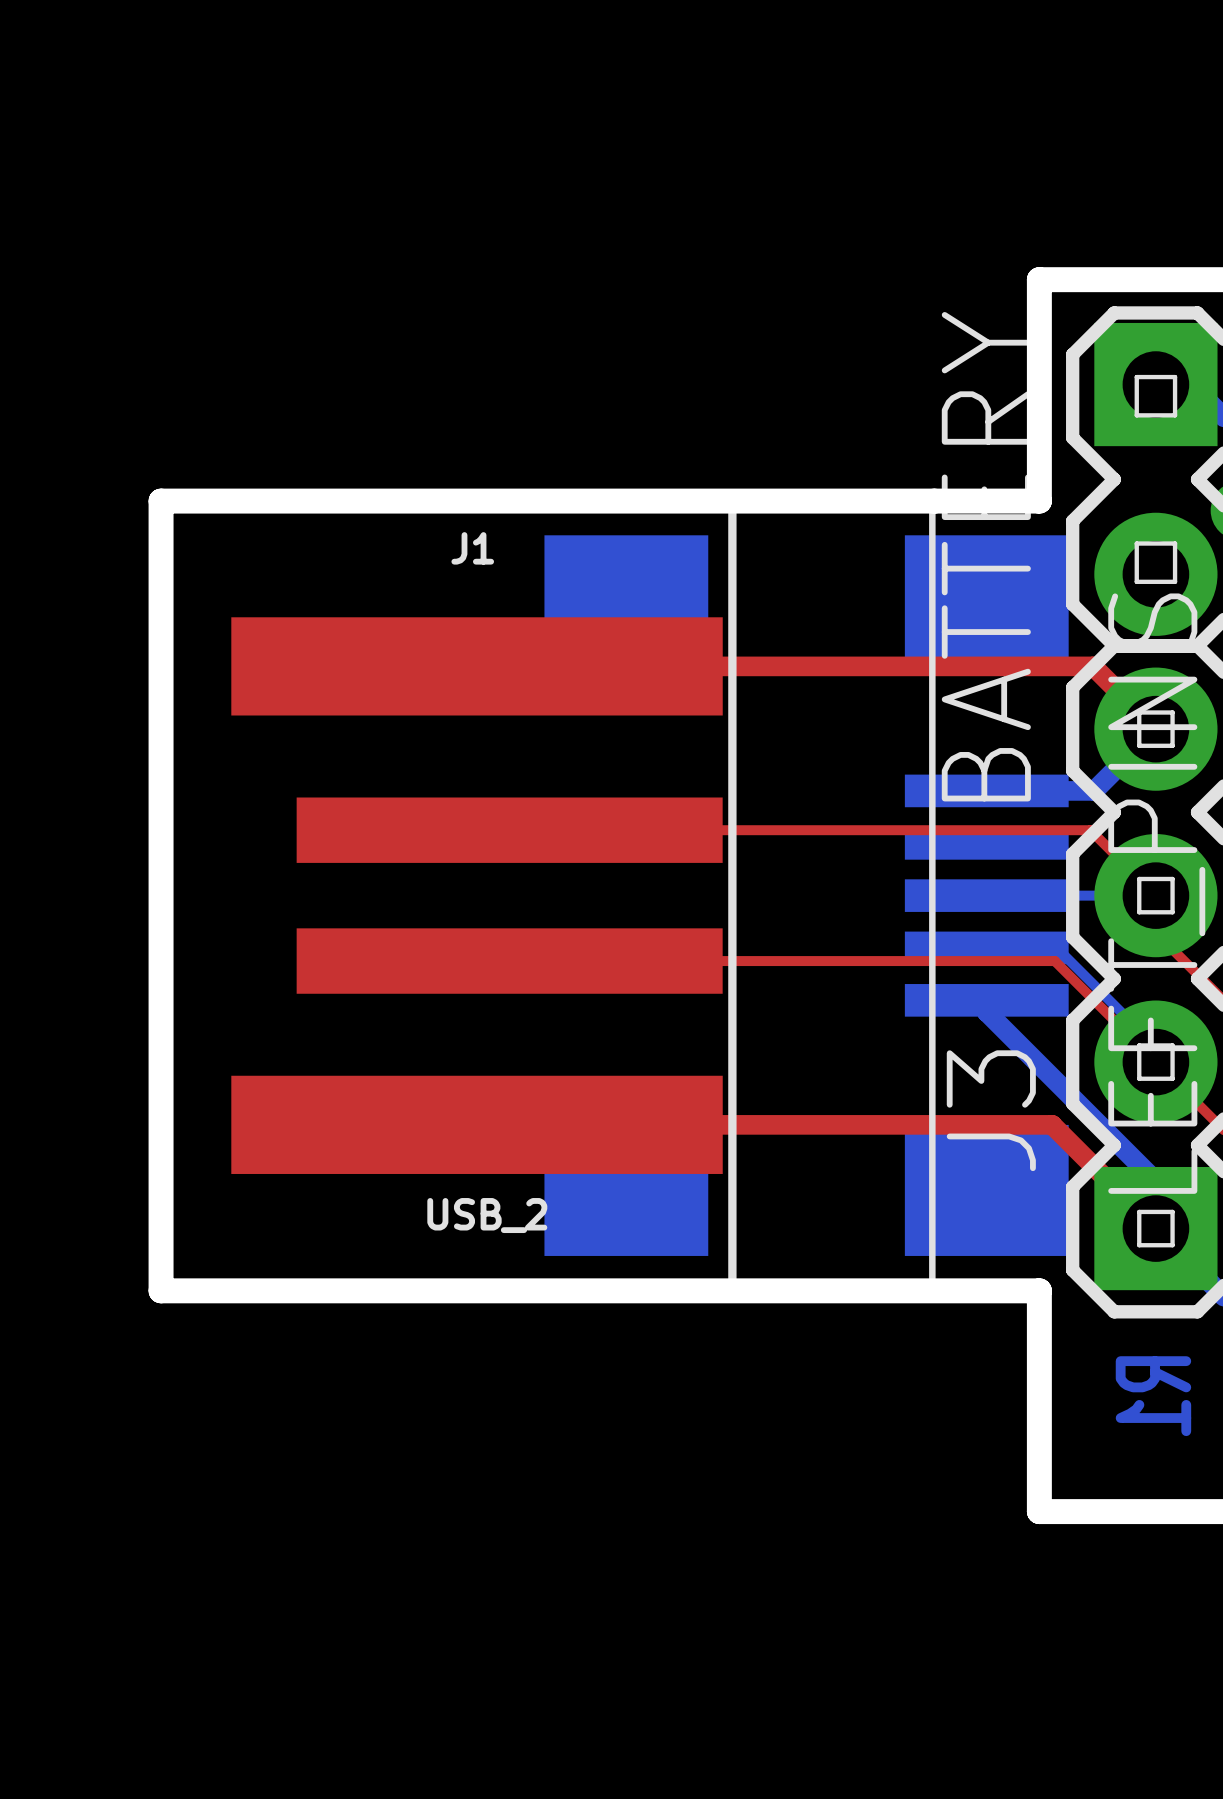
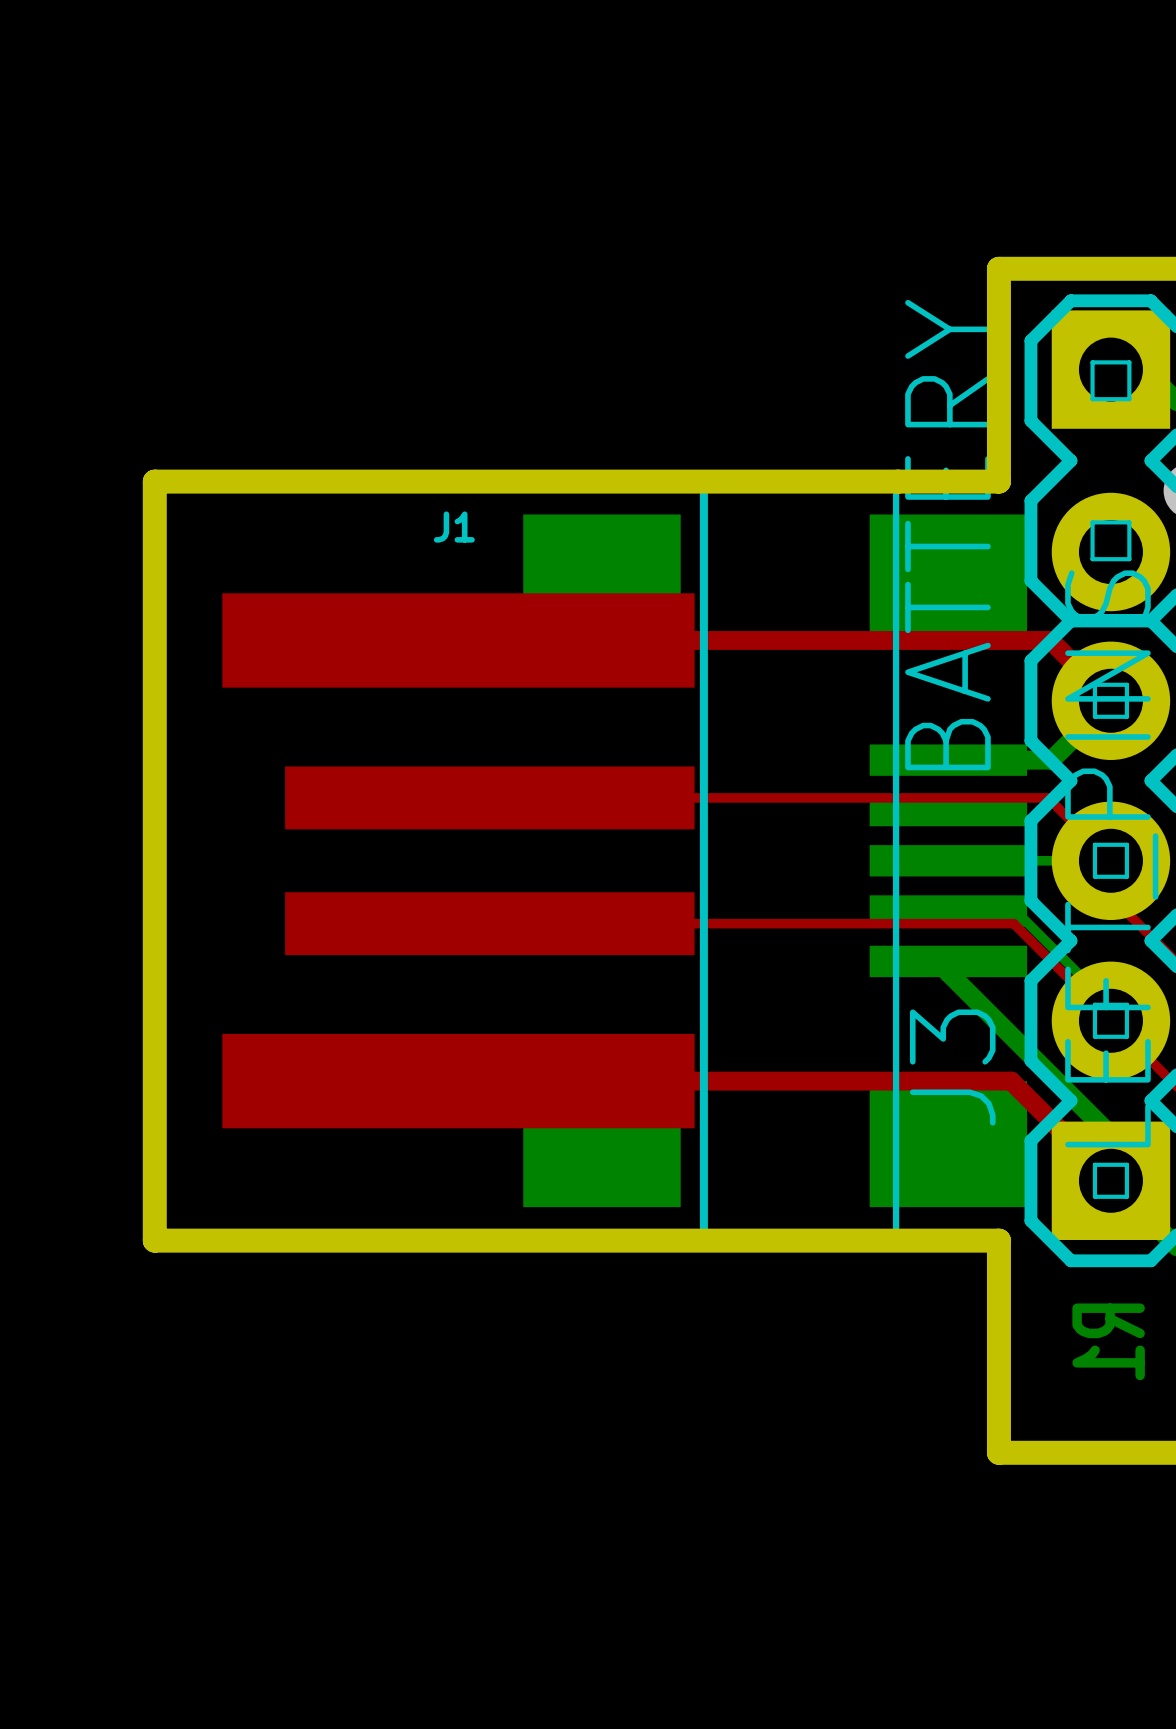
J1 value: USB_2 (487, 1215) -> none

